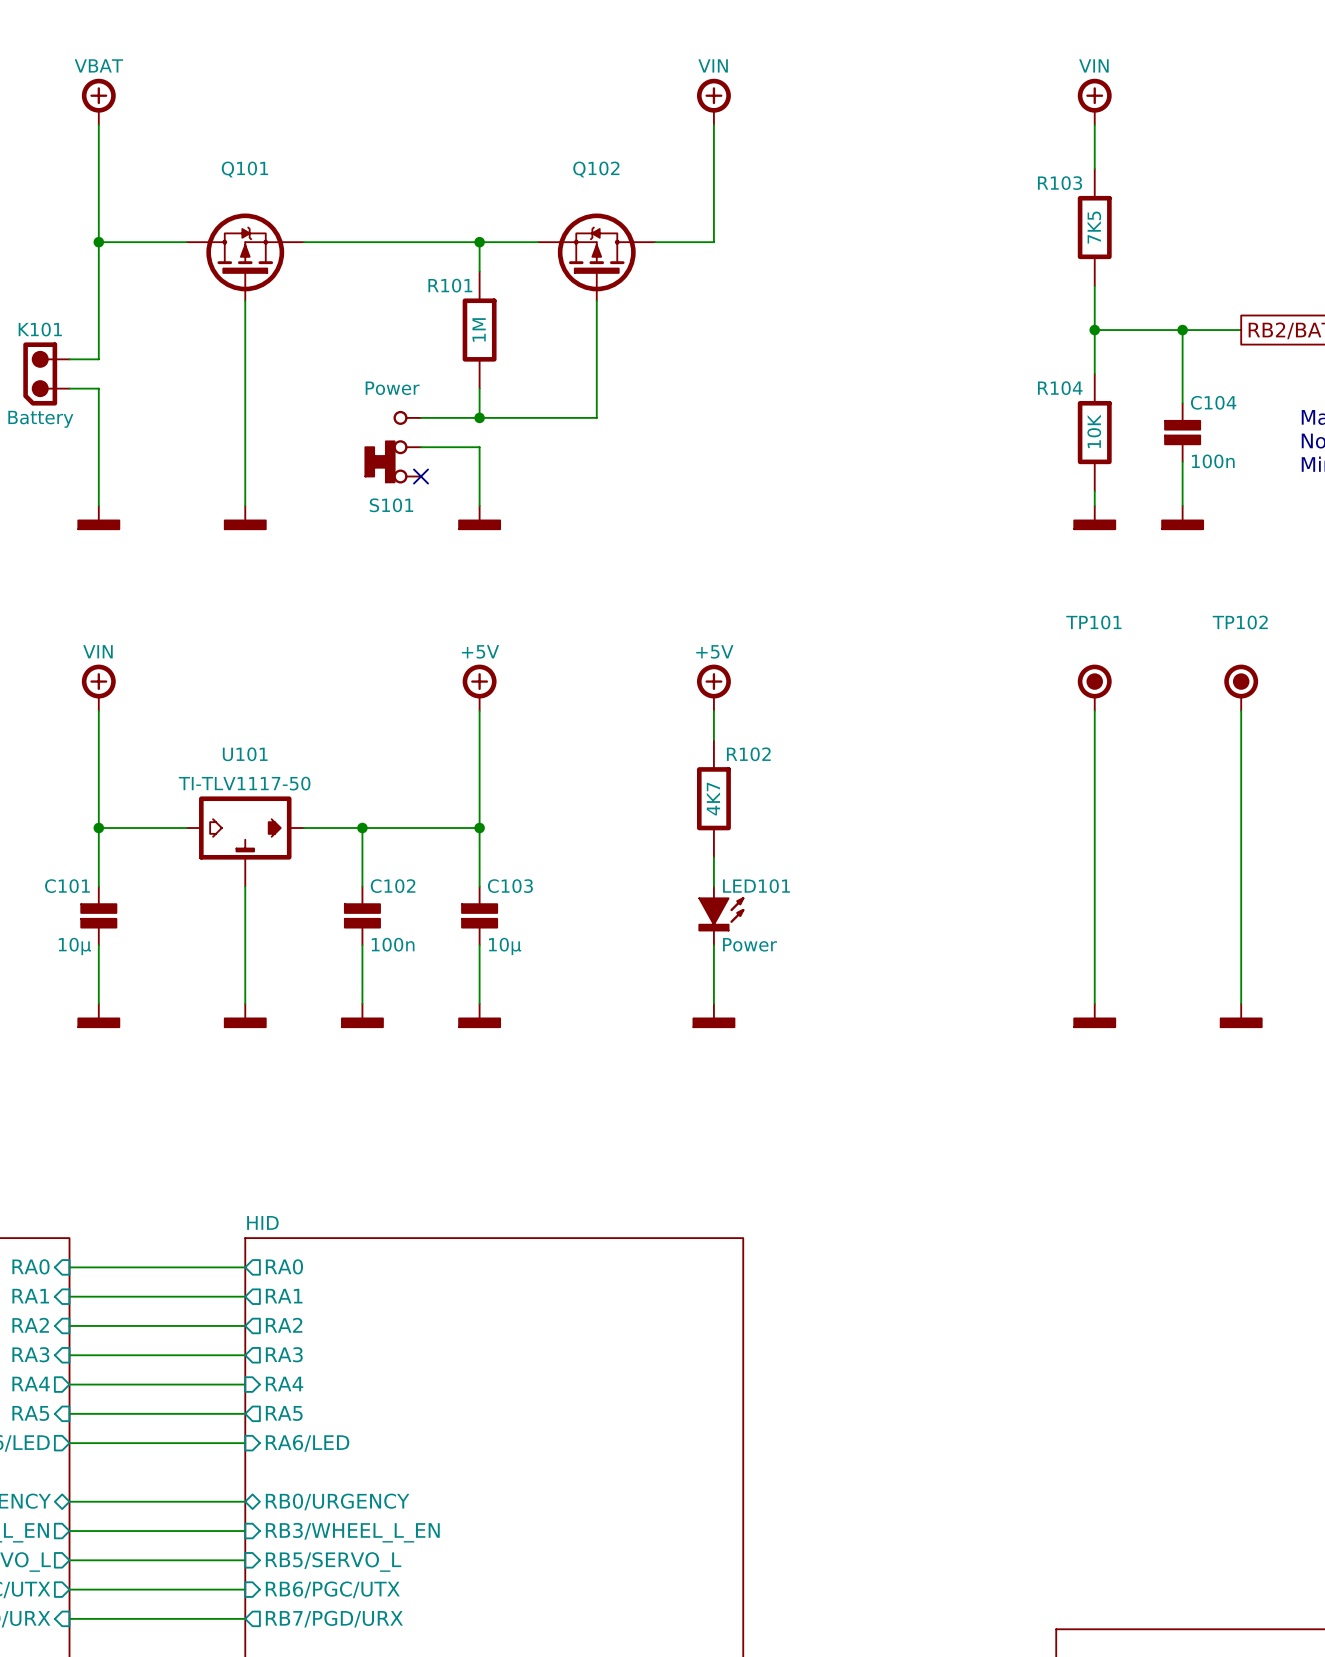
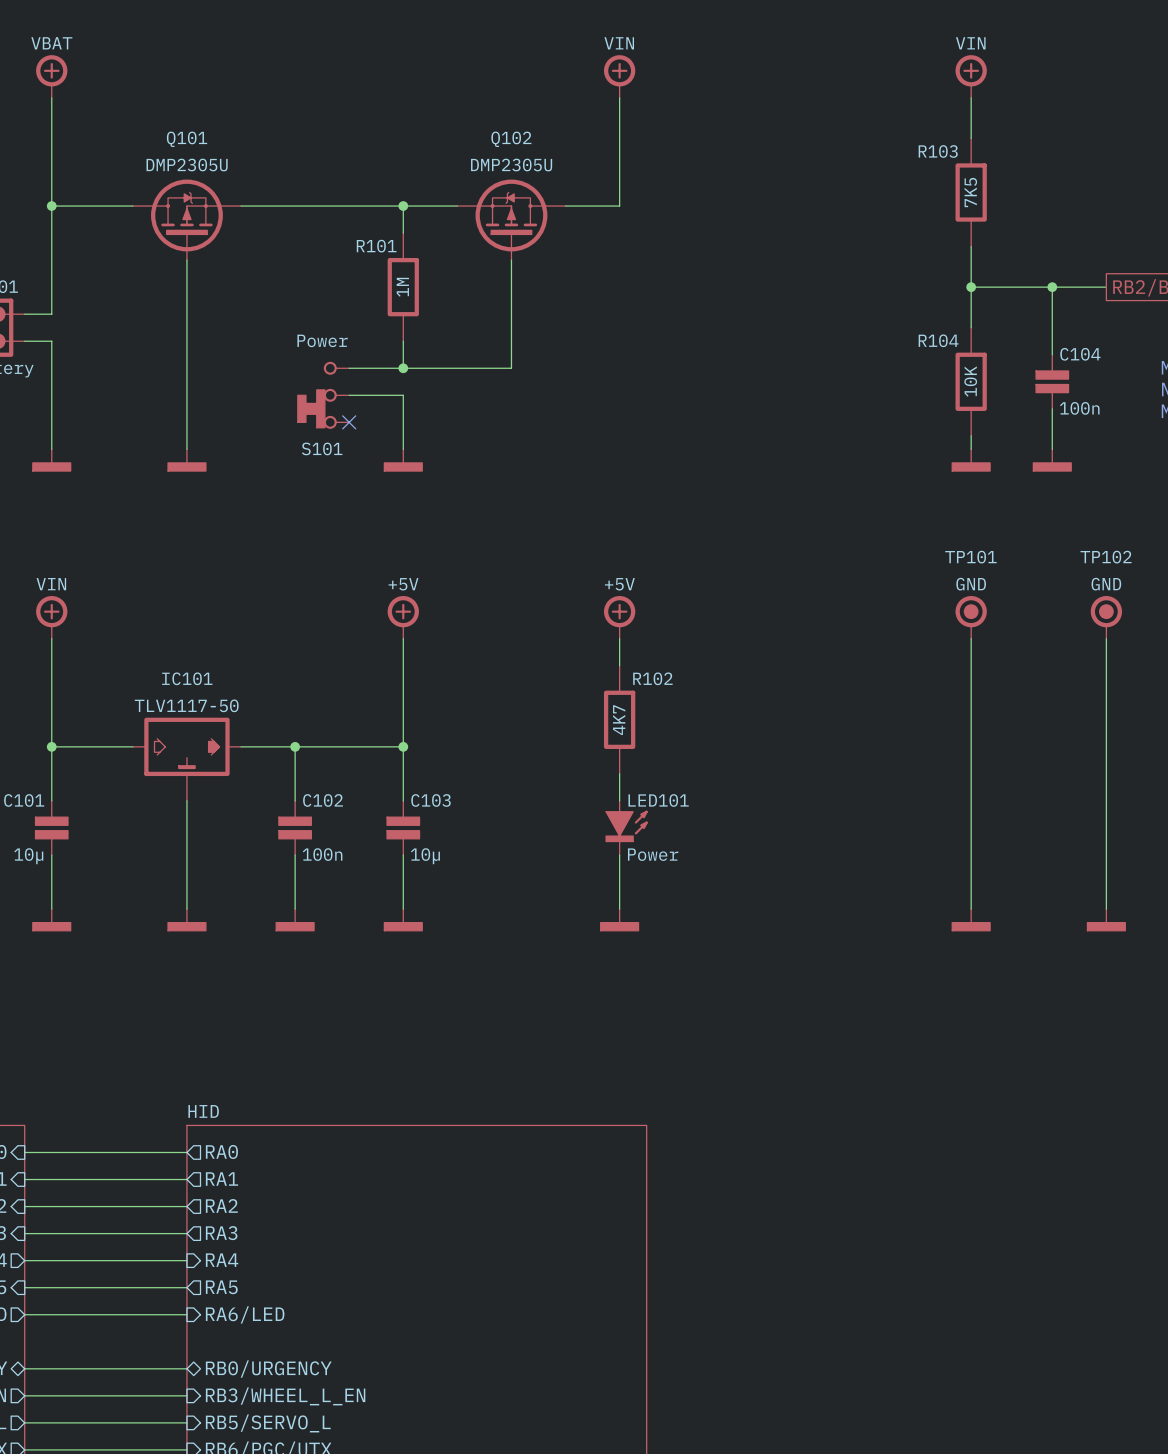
Q101 text: none -> DMP2305U (187, 165)
Q102 text: none -> DMP2305U (511, 165)
TP101 text: none -> GND (971, 584)
TP102 text: none -> GND (1106, 584)
U101 name: U101 (245, 754) -> IC101 (187, 678)
U101 text: none -> TLV1117-50 (186, 705)
U101 value: TI-TLV1117-50 (244, 783) -> none

